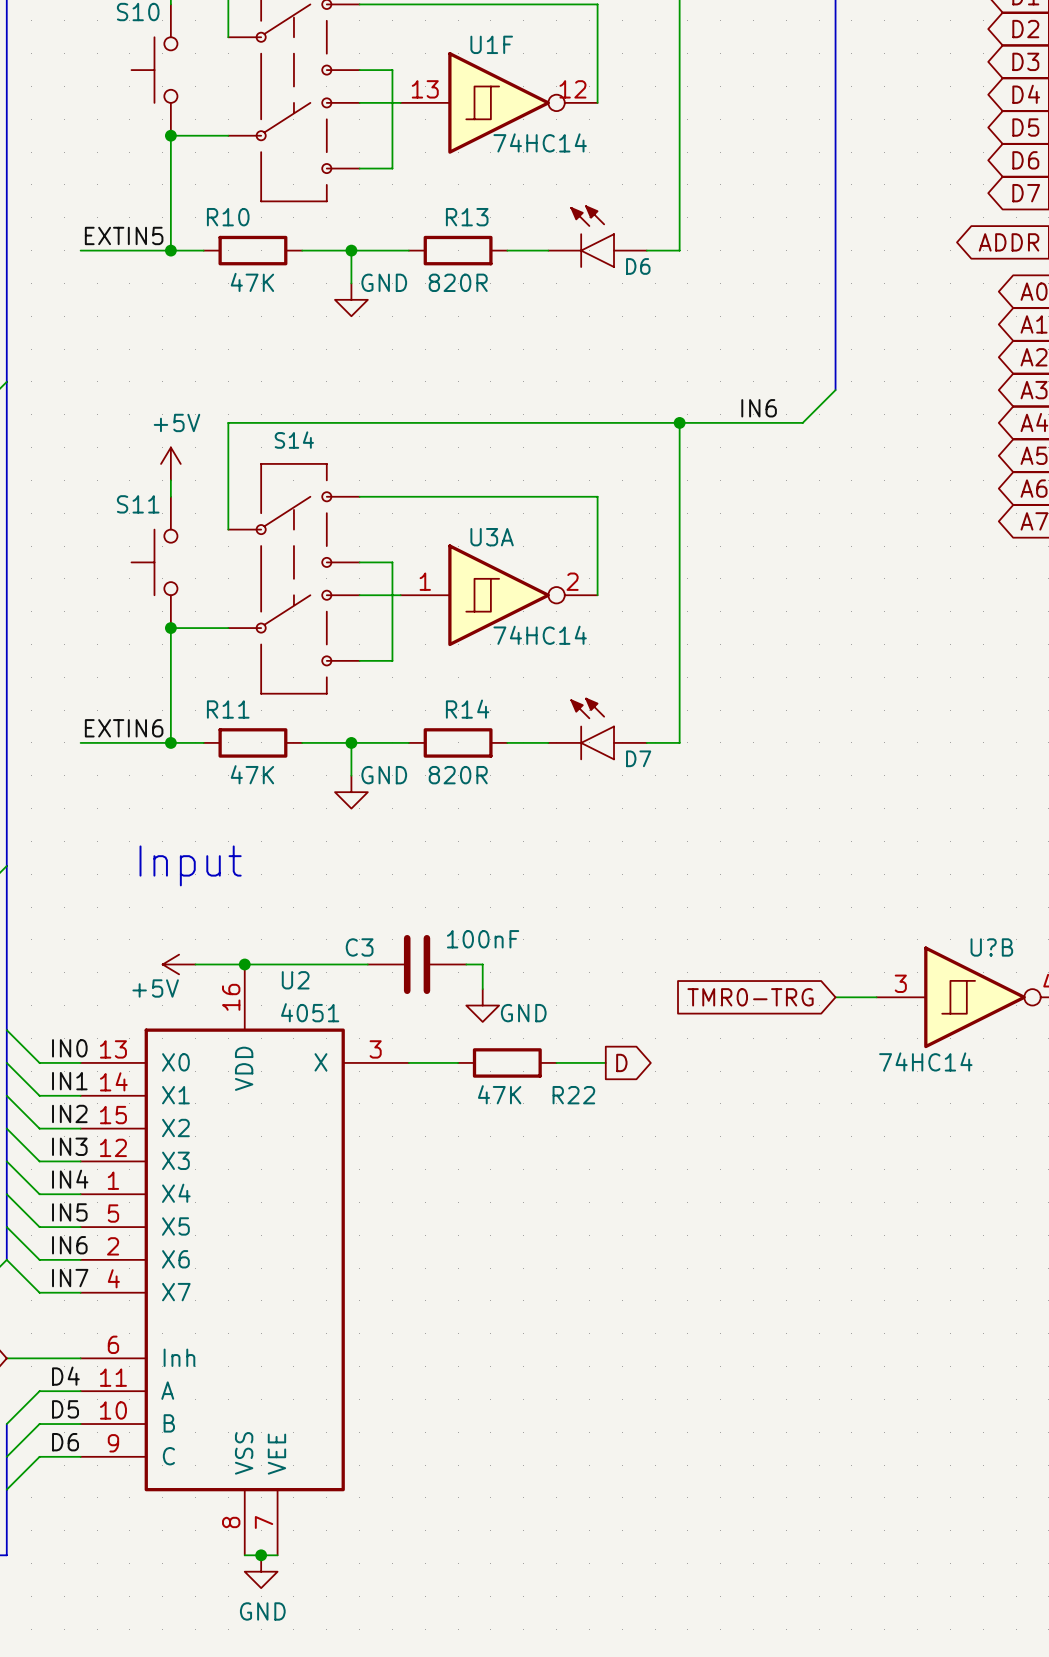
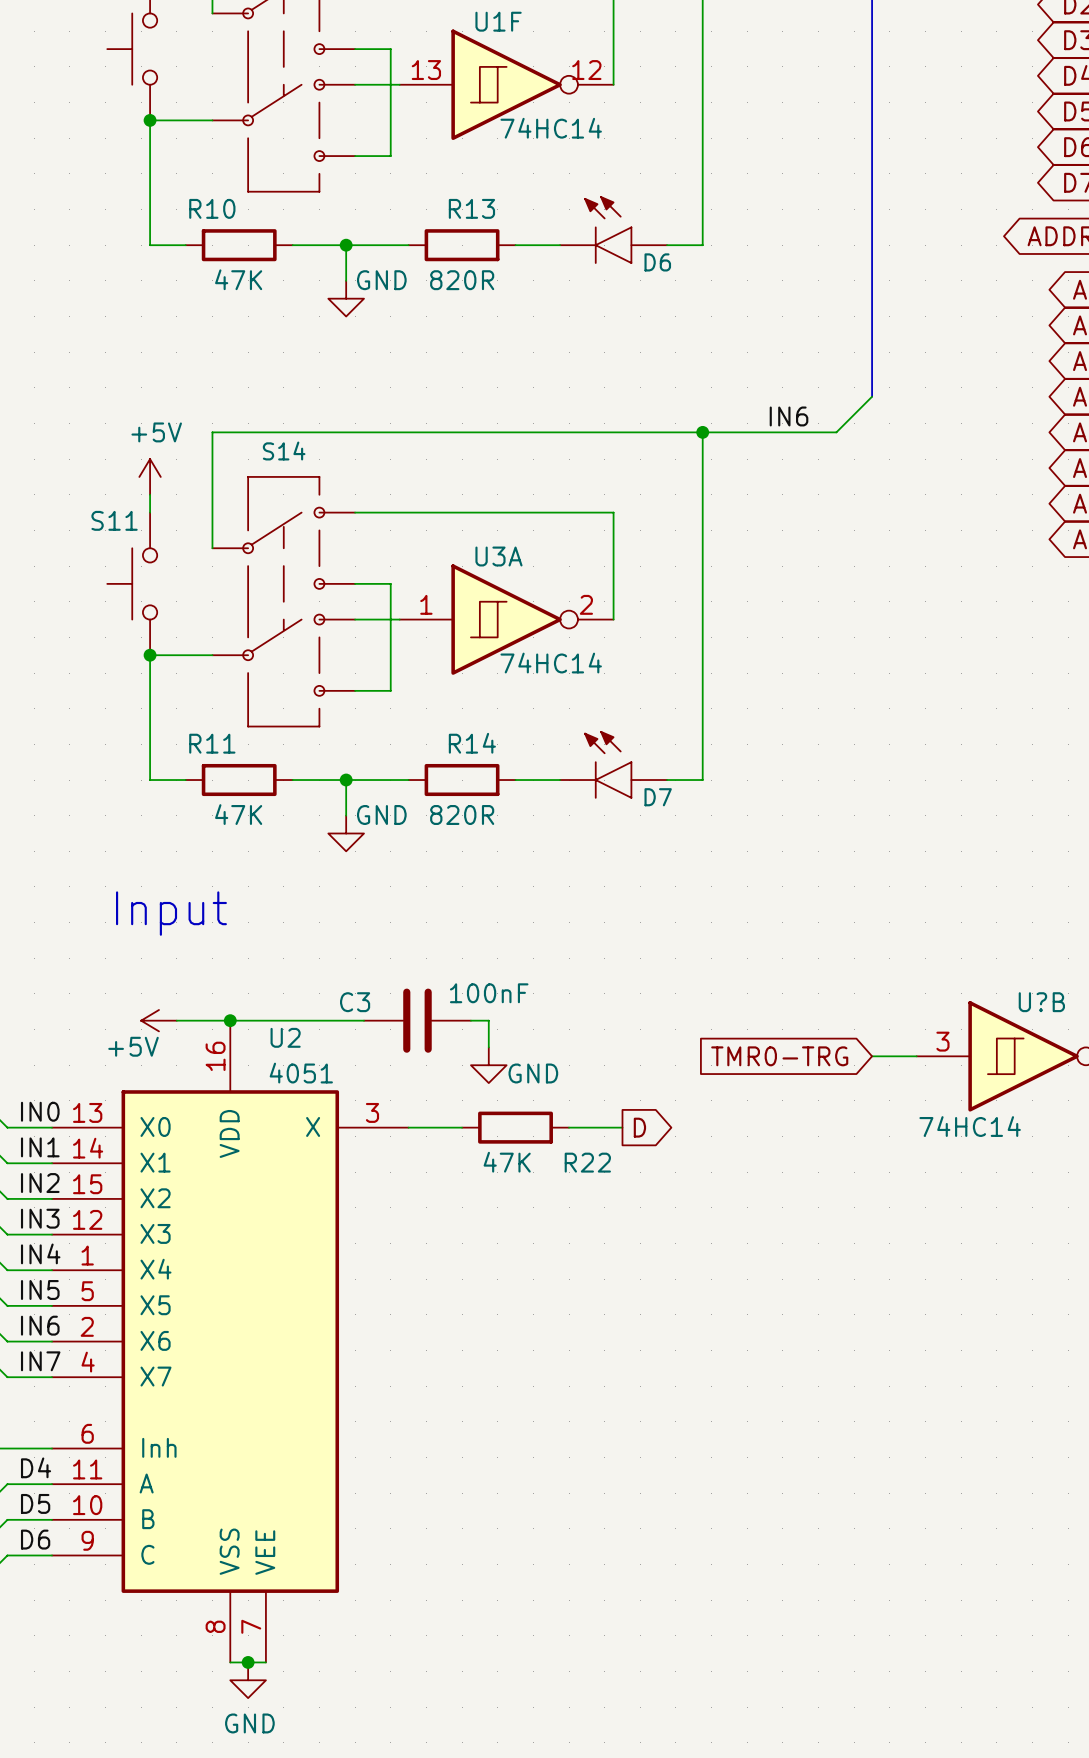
label: EXTIN5 (124, 235) -> none
wire: (80, 250) (170, 250) -> none
junction: (170, 250) -> none
label: EXTIN6 (124, 728) -> none
wire: (80, 742) (170, 742) -> none
junction: (170, 742) -> none
U2 symbol: [80, 964, 409, 1556] -> [52, 1020, 409, 1663]

